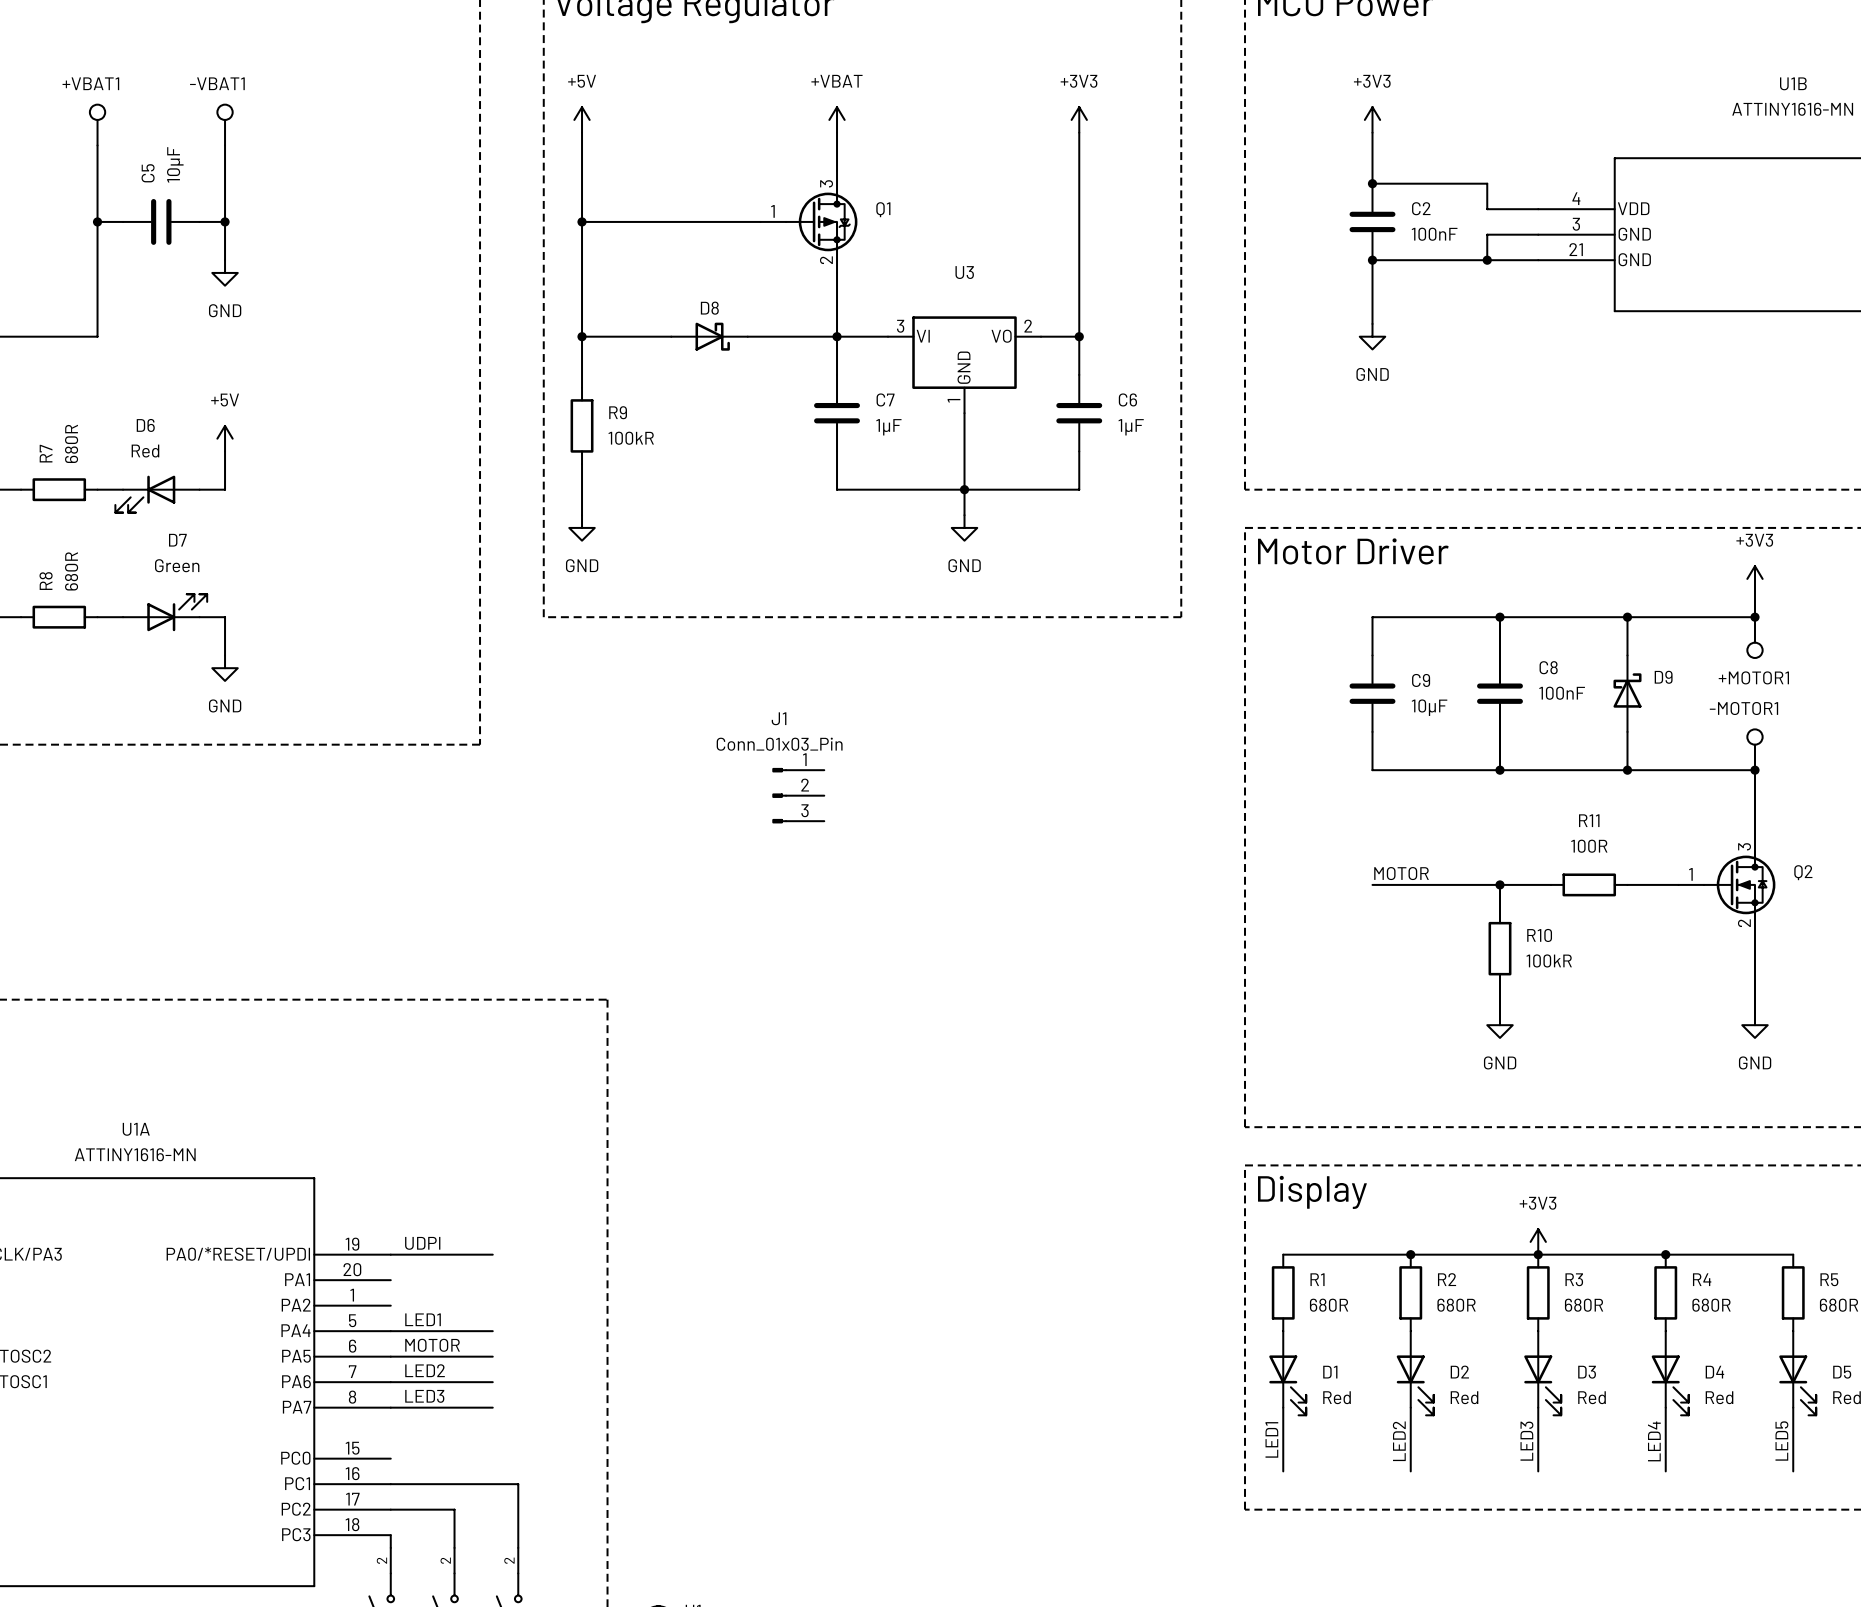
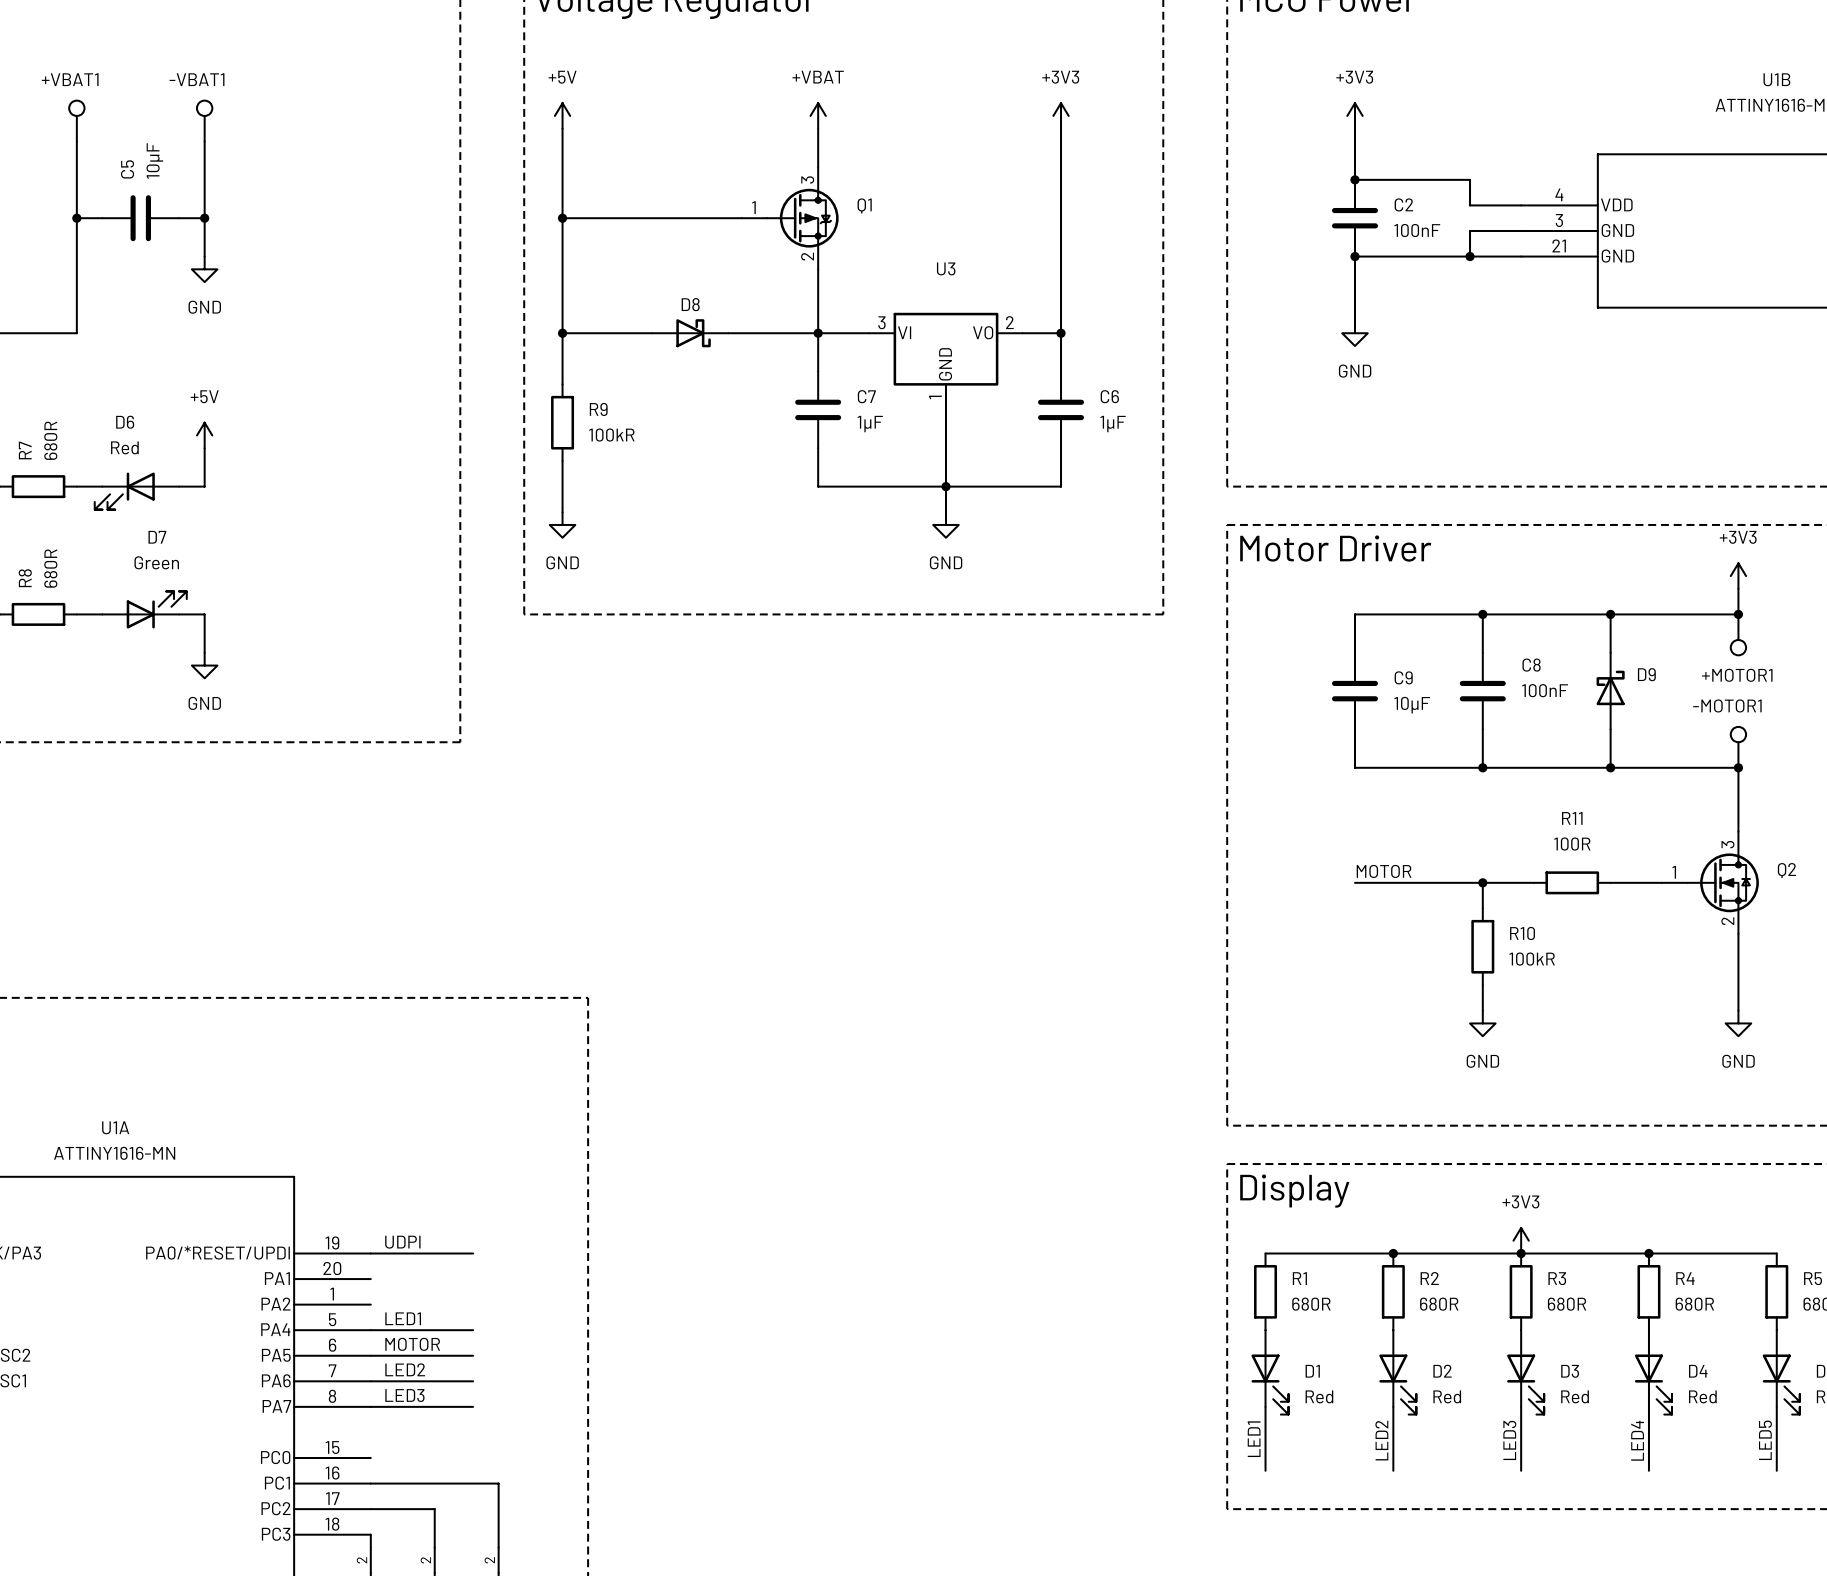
J1: Conn_01x03_Pin (798, 795) -> none

